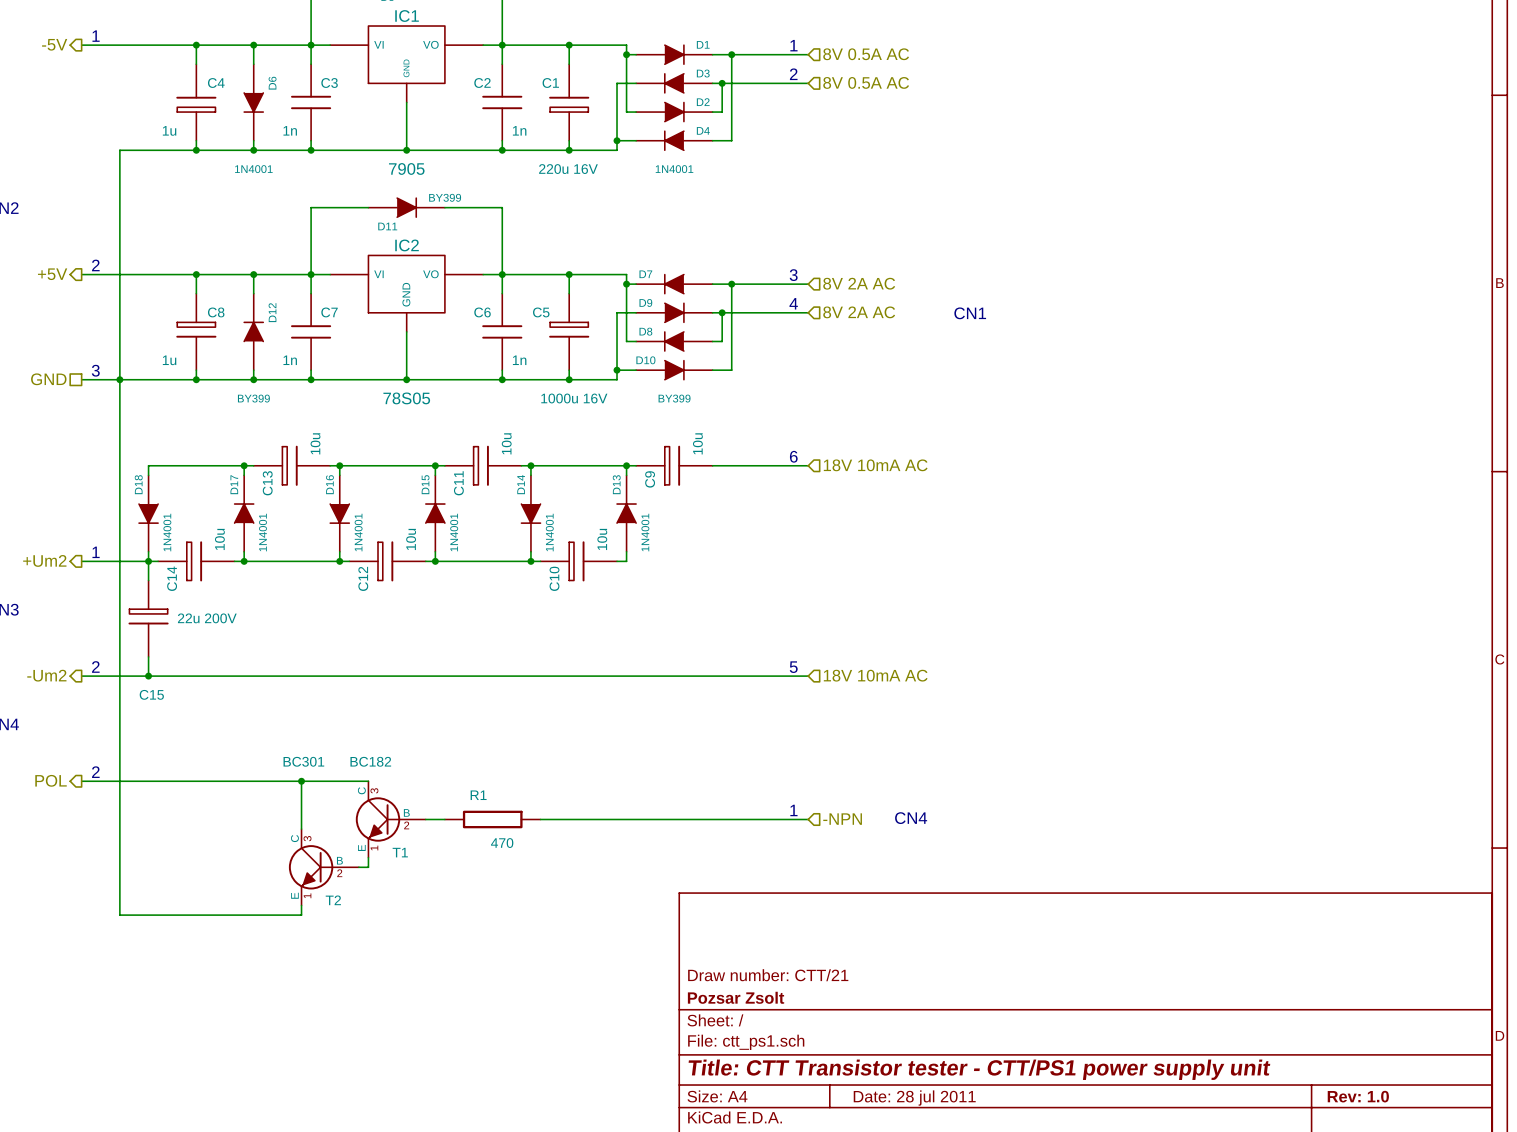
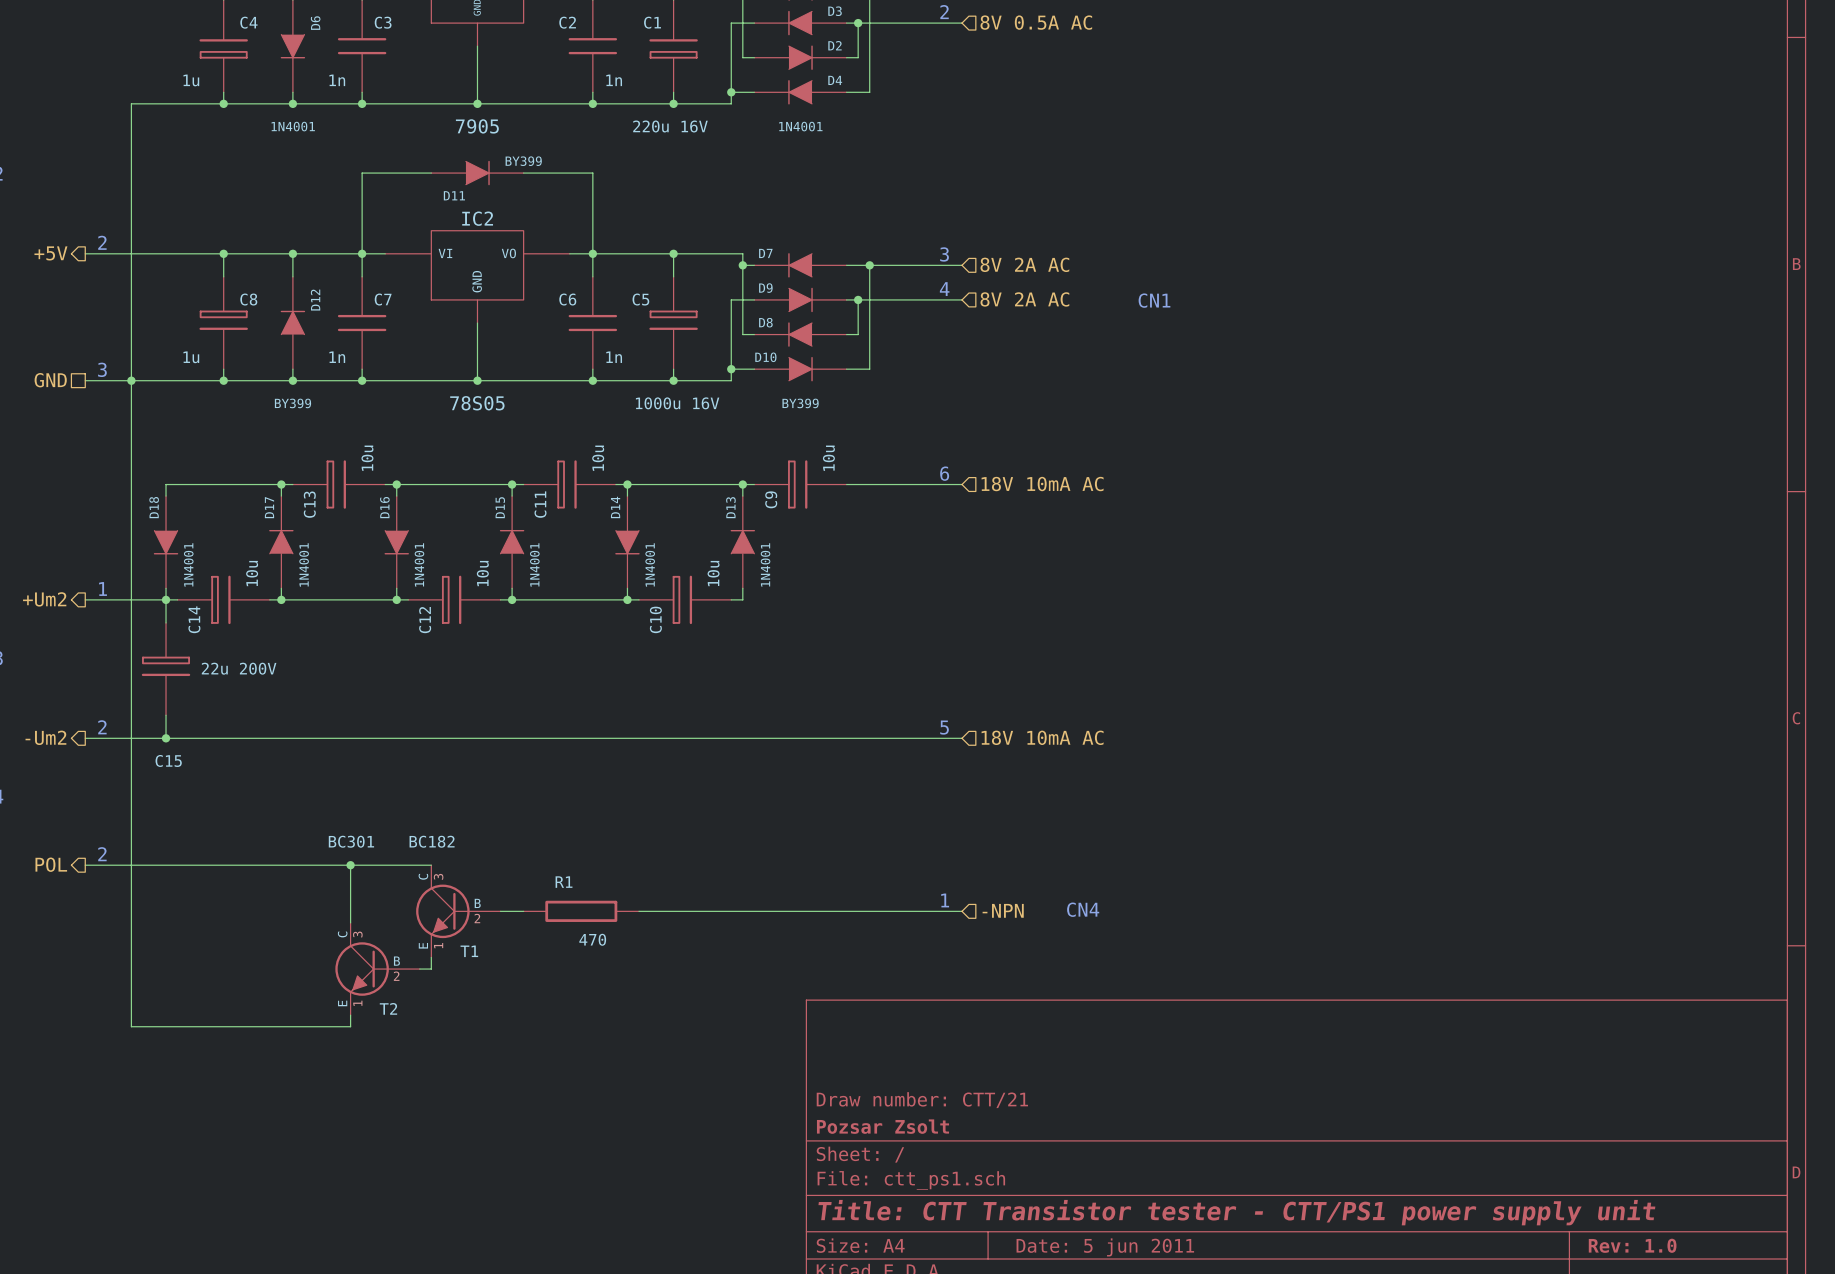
title block: Date: 28 jul 2011 (914, 1098) -> Date: 5 jun 2011 (1105, 1247)

